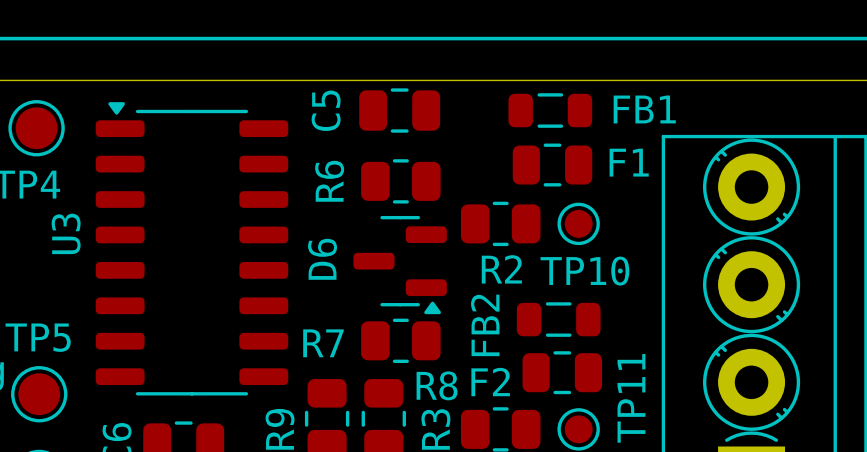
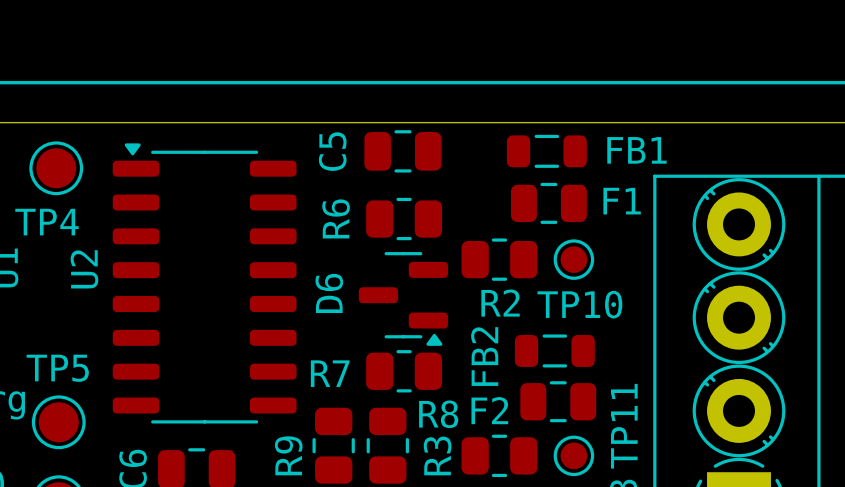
U3 name: U3 (66, 233) -> U2 (84, 269)

